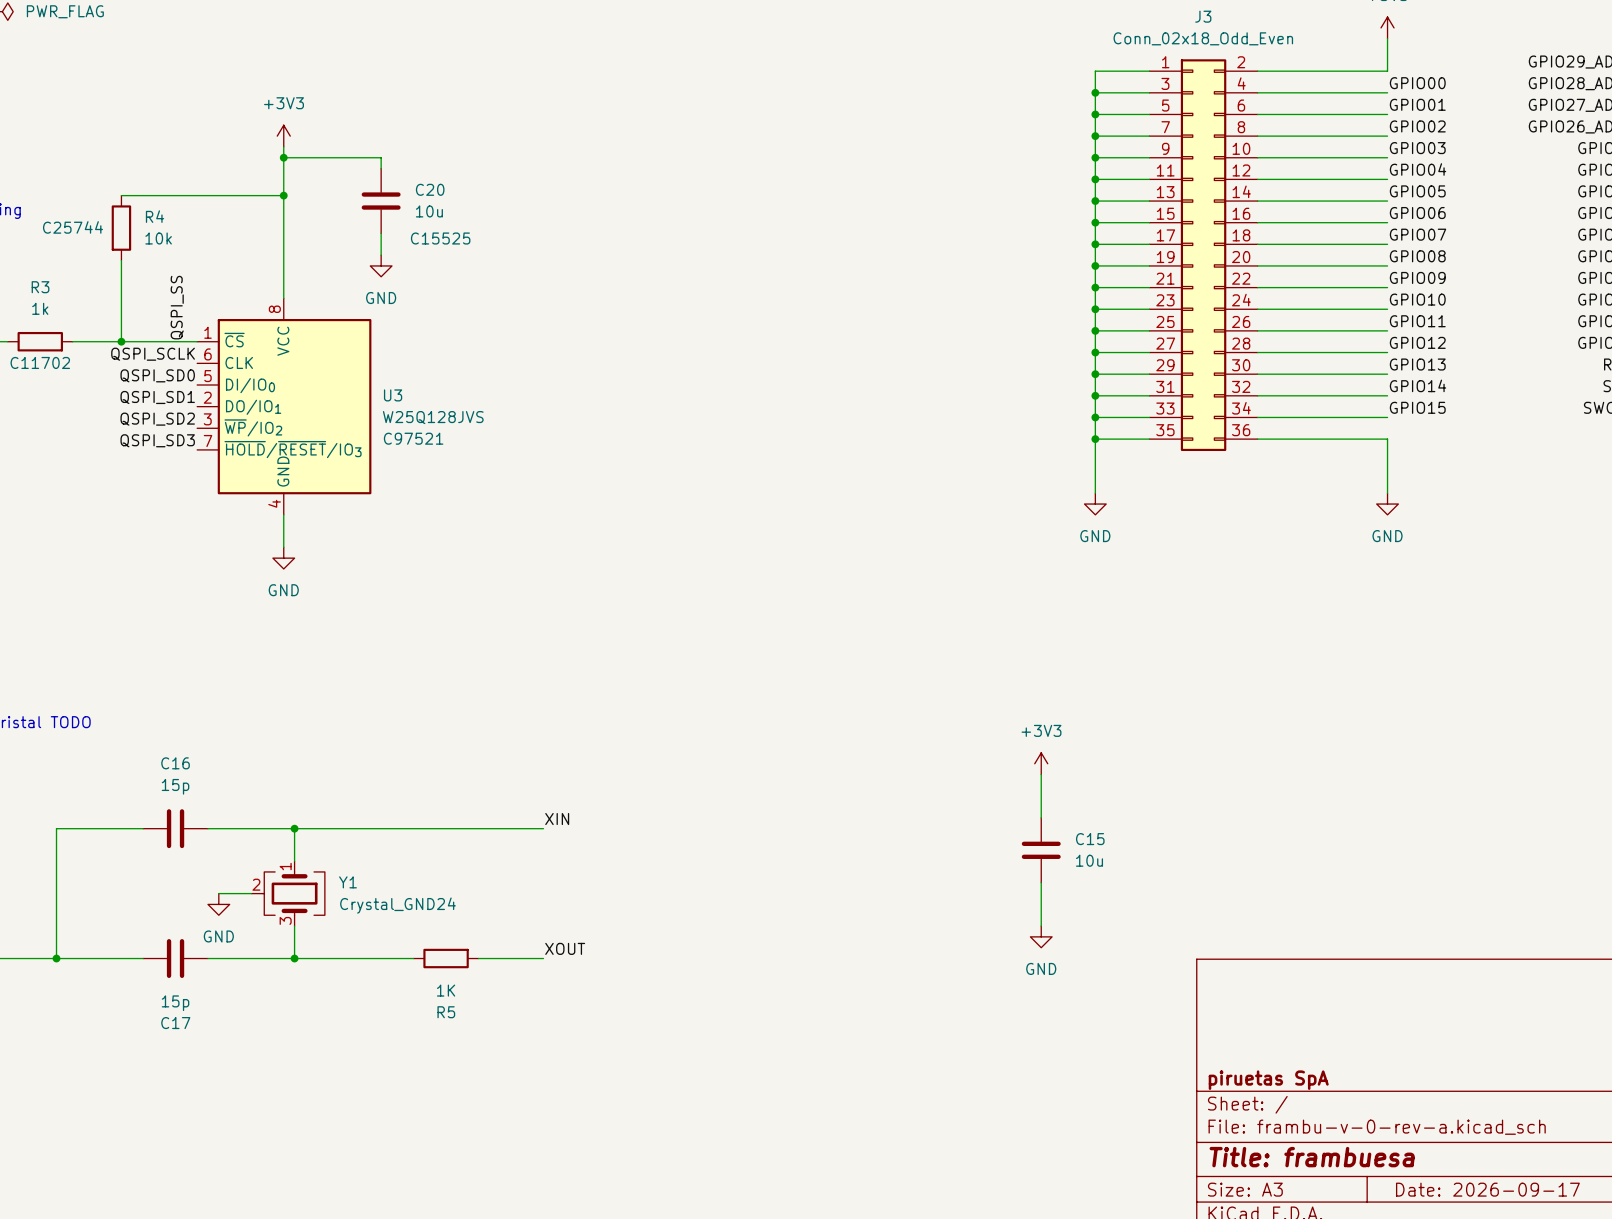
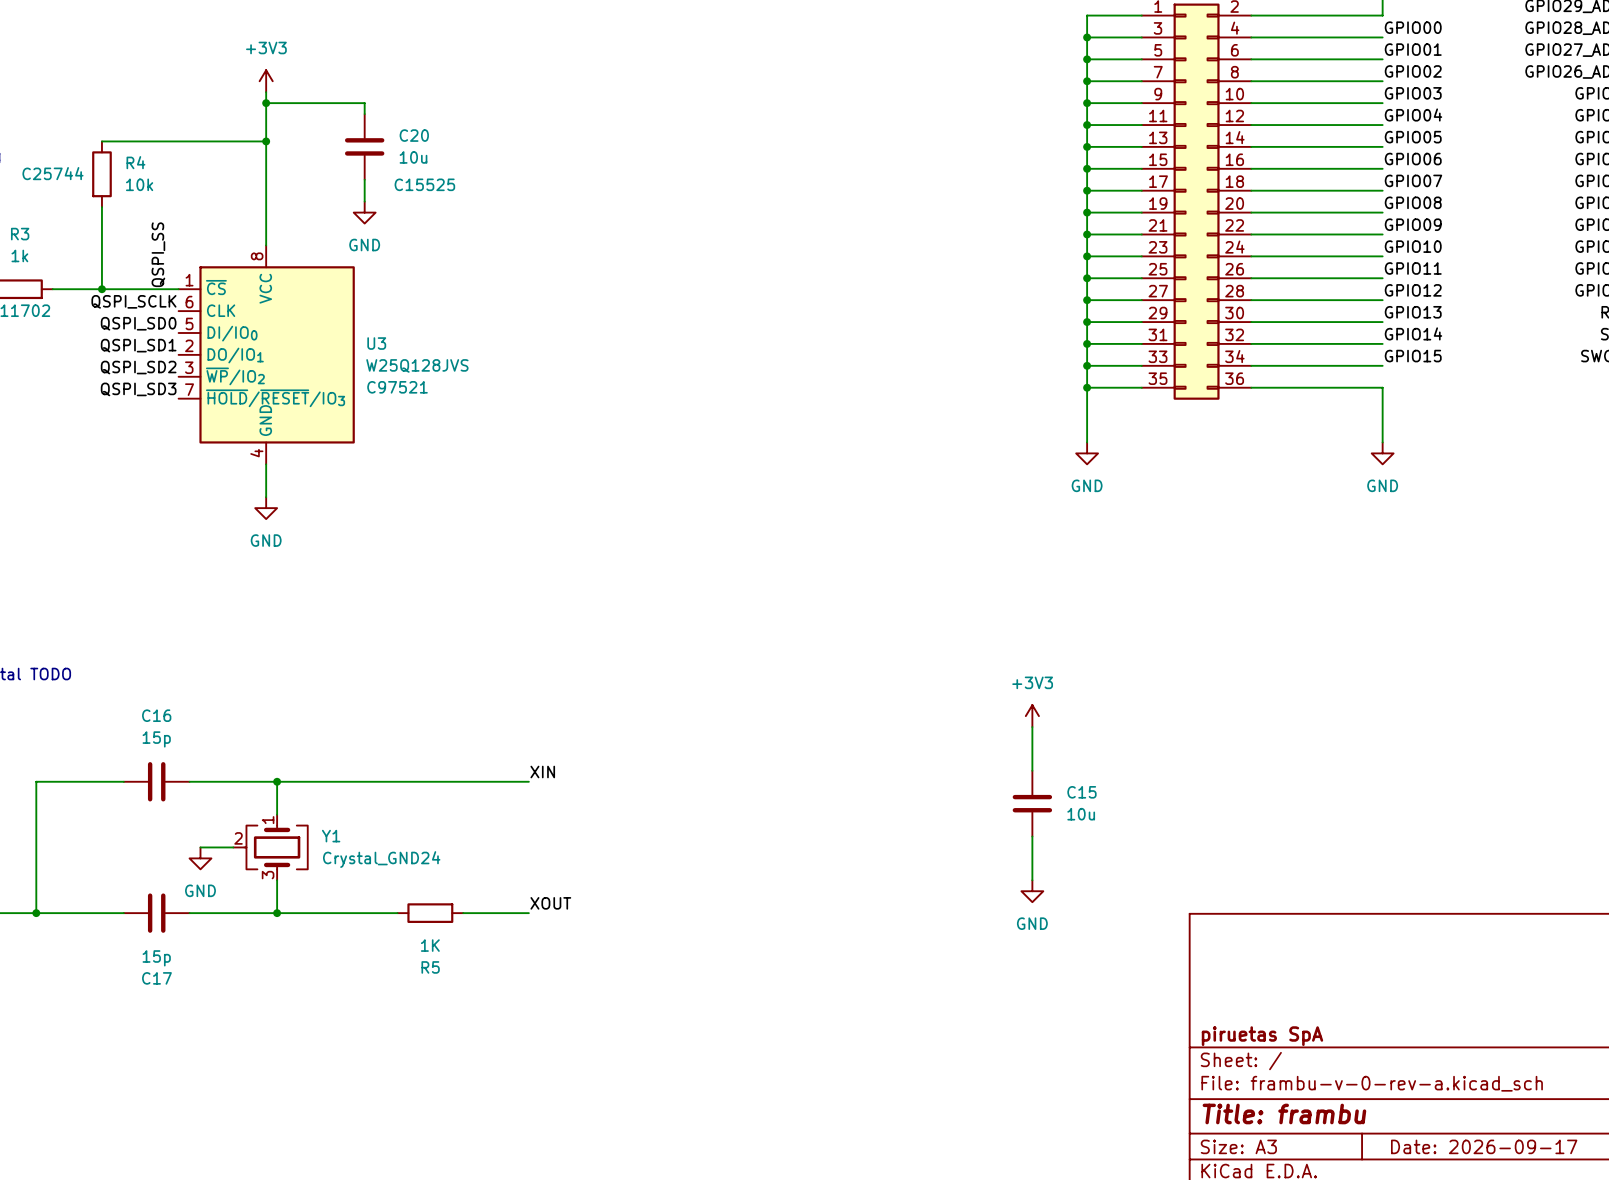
title block: Title: frambuesa (1312, 1157) -> Title: frambu (1284, 1113)

